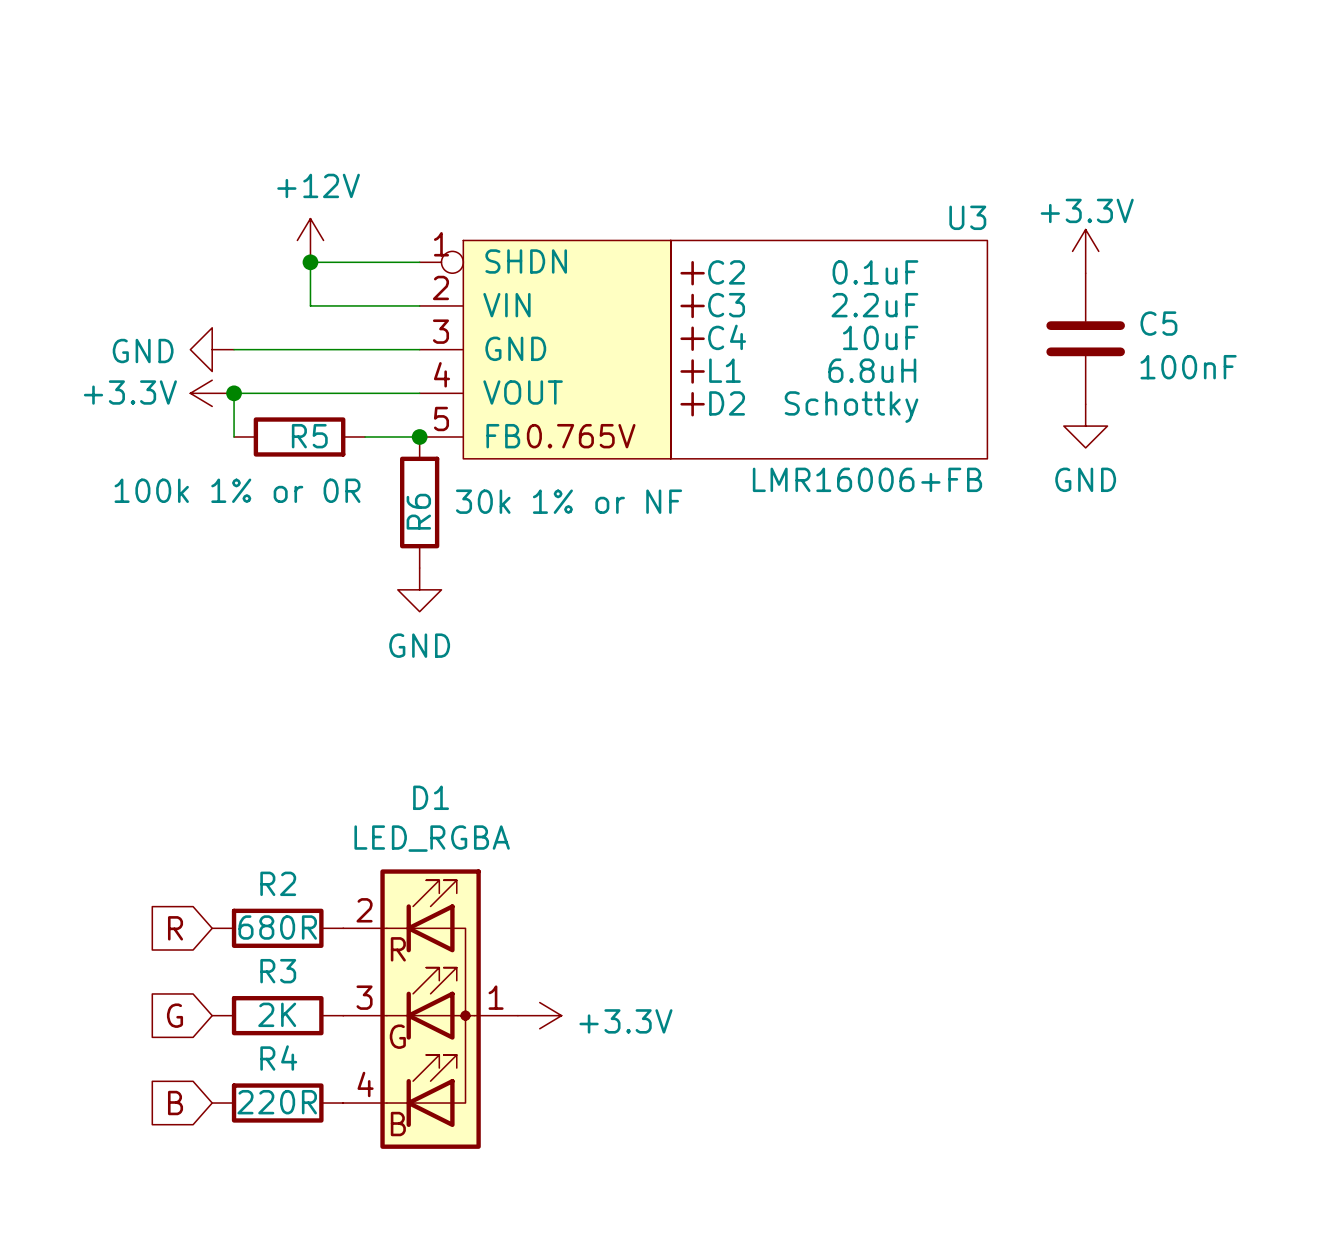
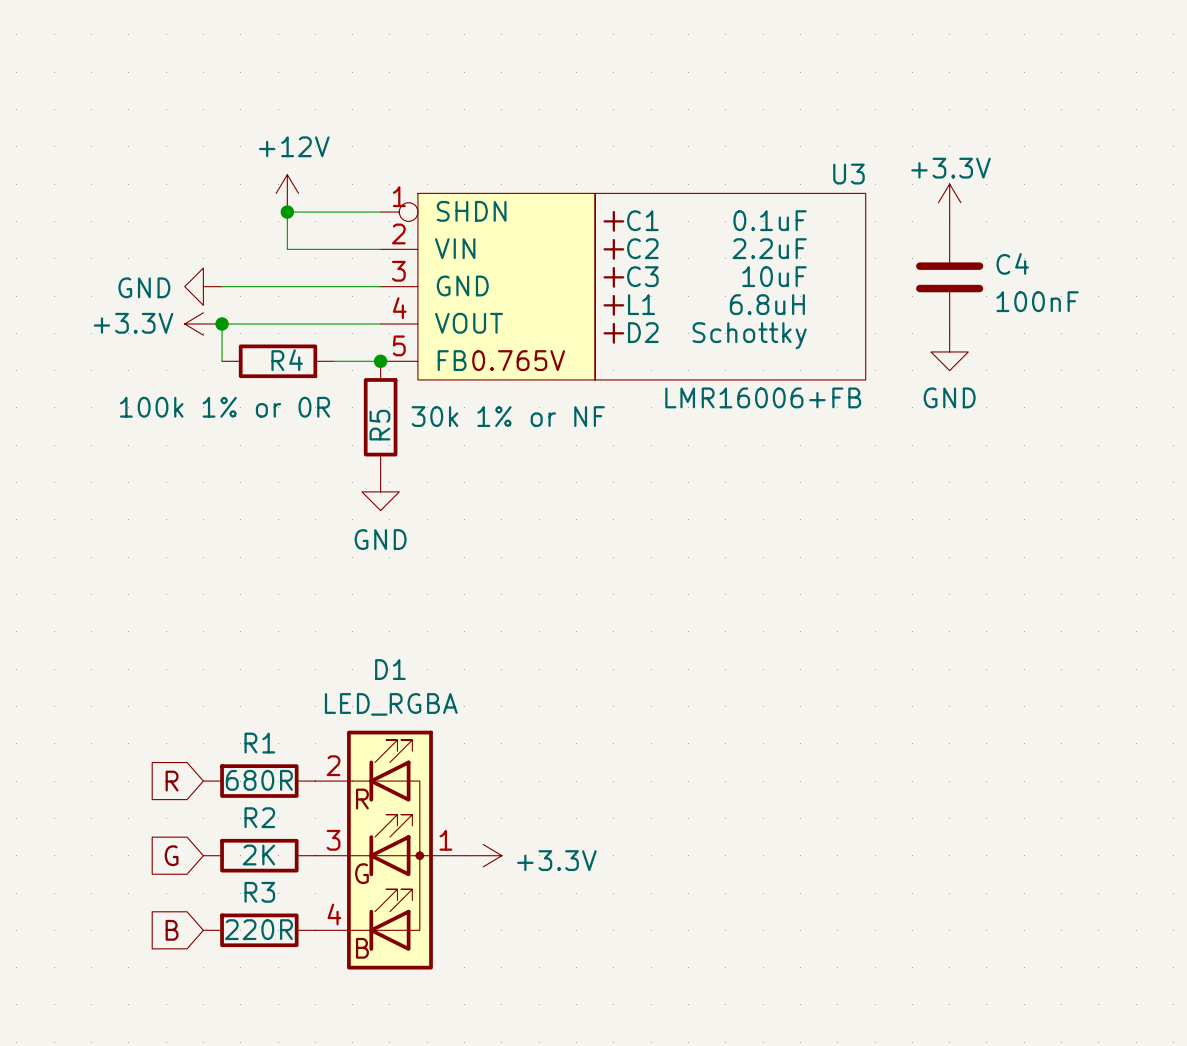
C2 name: C2 (726, 272) -> C1 (642, 220)
C3 name: C3 (726, 305) -> C2 (642, 248)
C5 name: C5 (1158, 323) -> C4 (1012, 263)
C4 name: C4 (727, 337) -> C3 (642, 276)
R5 name: R5 (309, 436) -> R4 (287, 360)
R6 name: R6 (418, 511) -> R5 (379, 425)
R2 name: R2 (278, 883) -> R1 (259, 743)
R3 name: R3 (278, 971) -> R2 (259, 817)
R4 name: R4 (278, 1058) -> R3 (259, 892)

